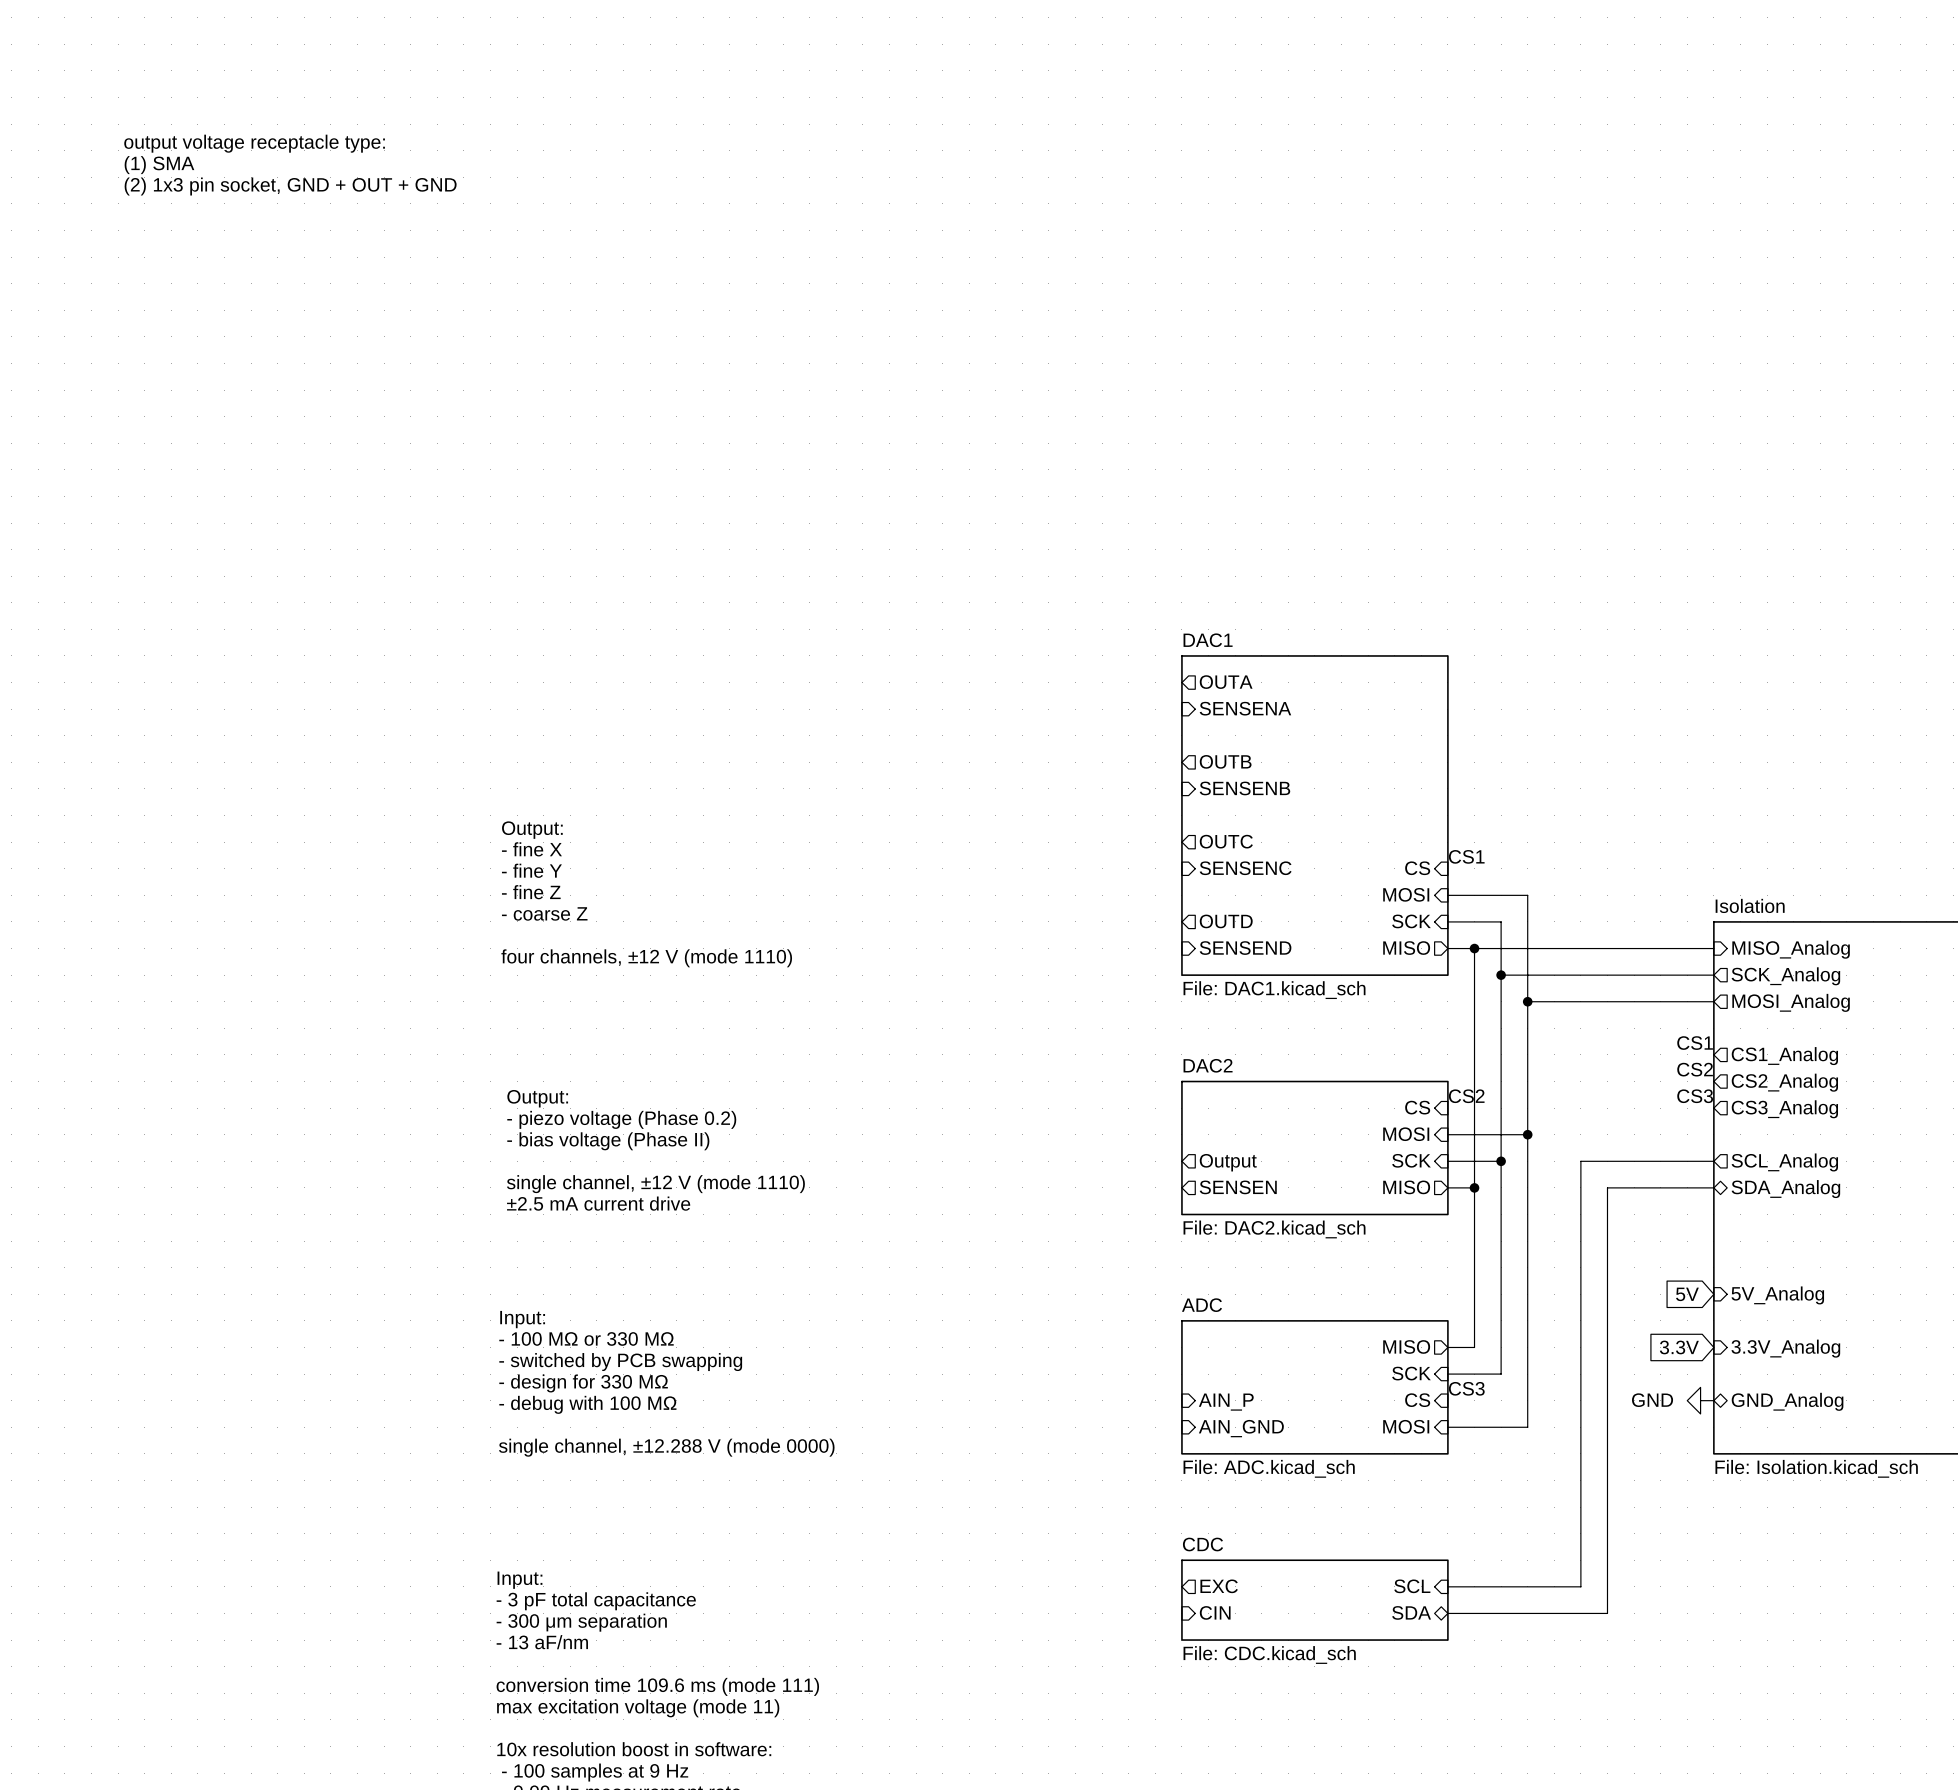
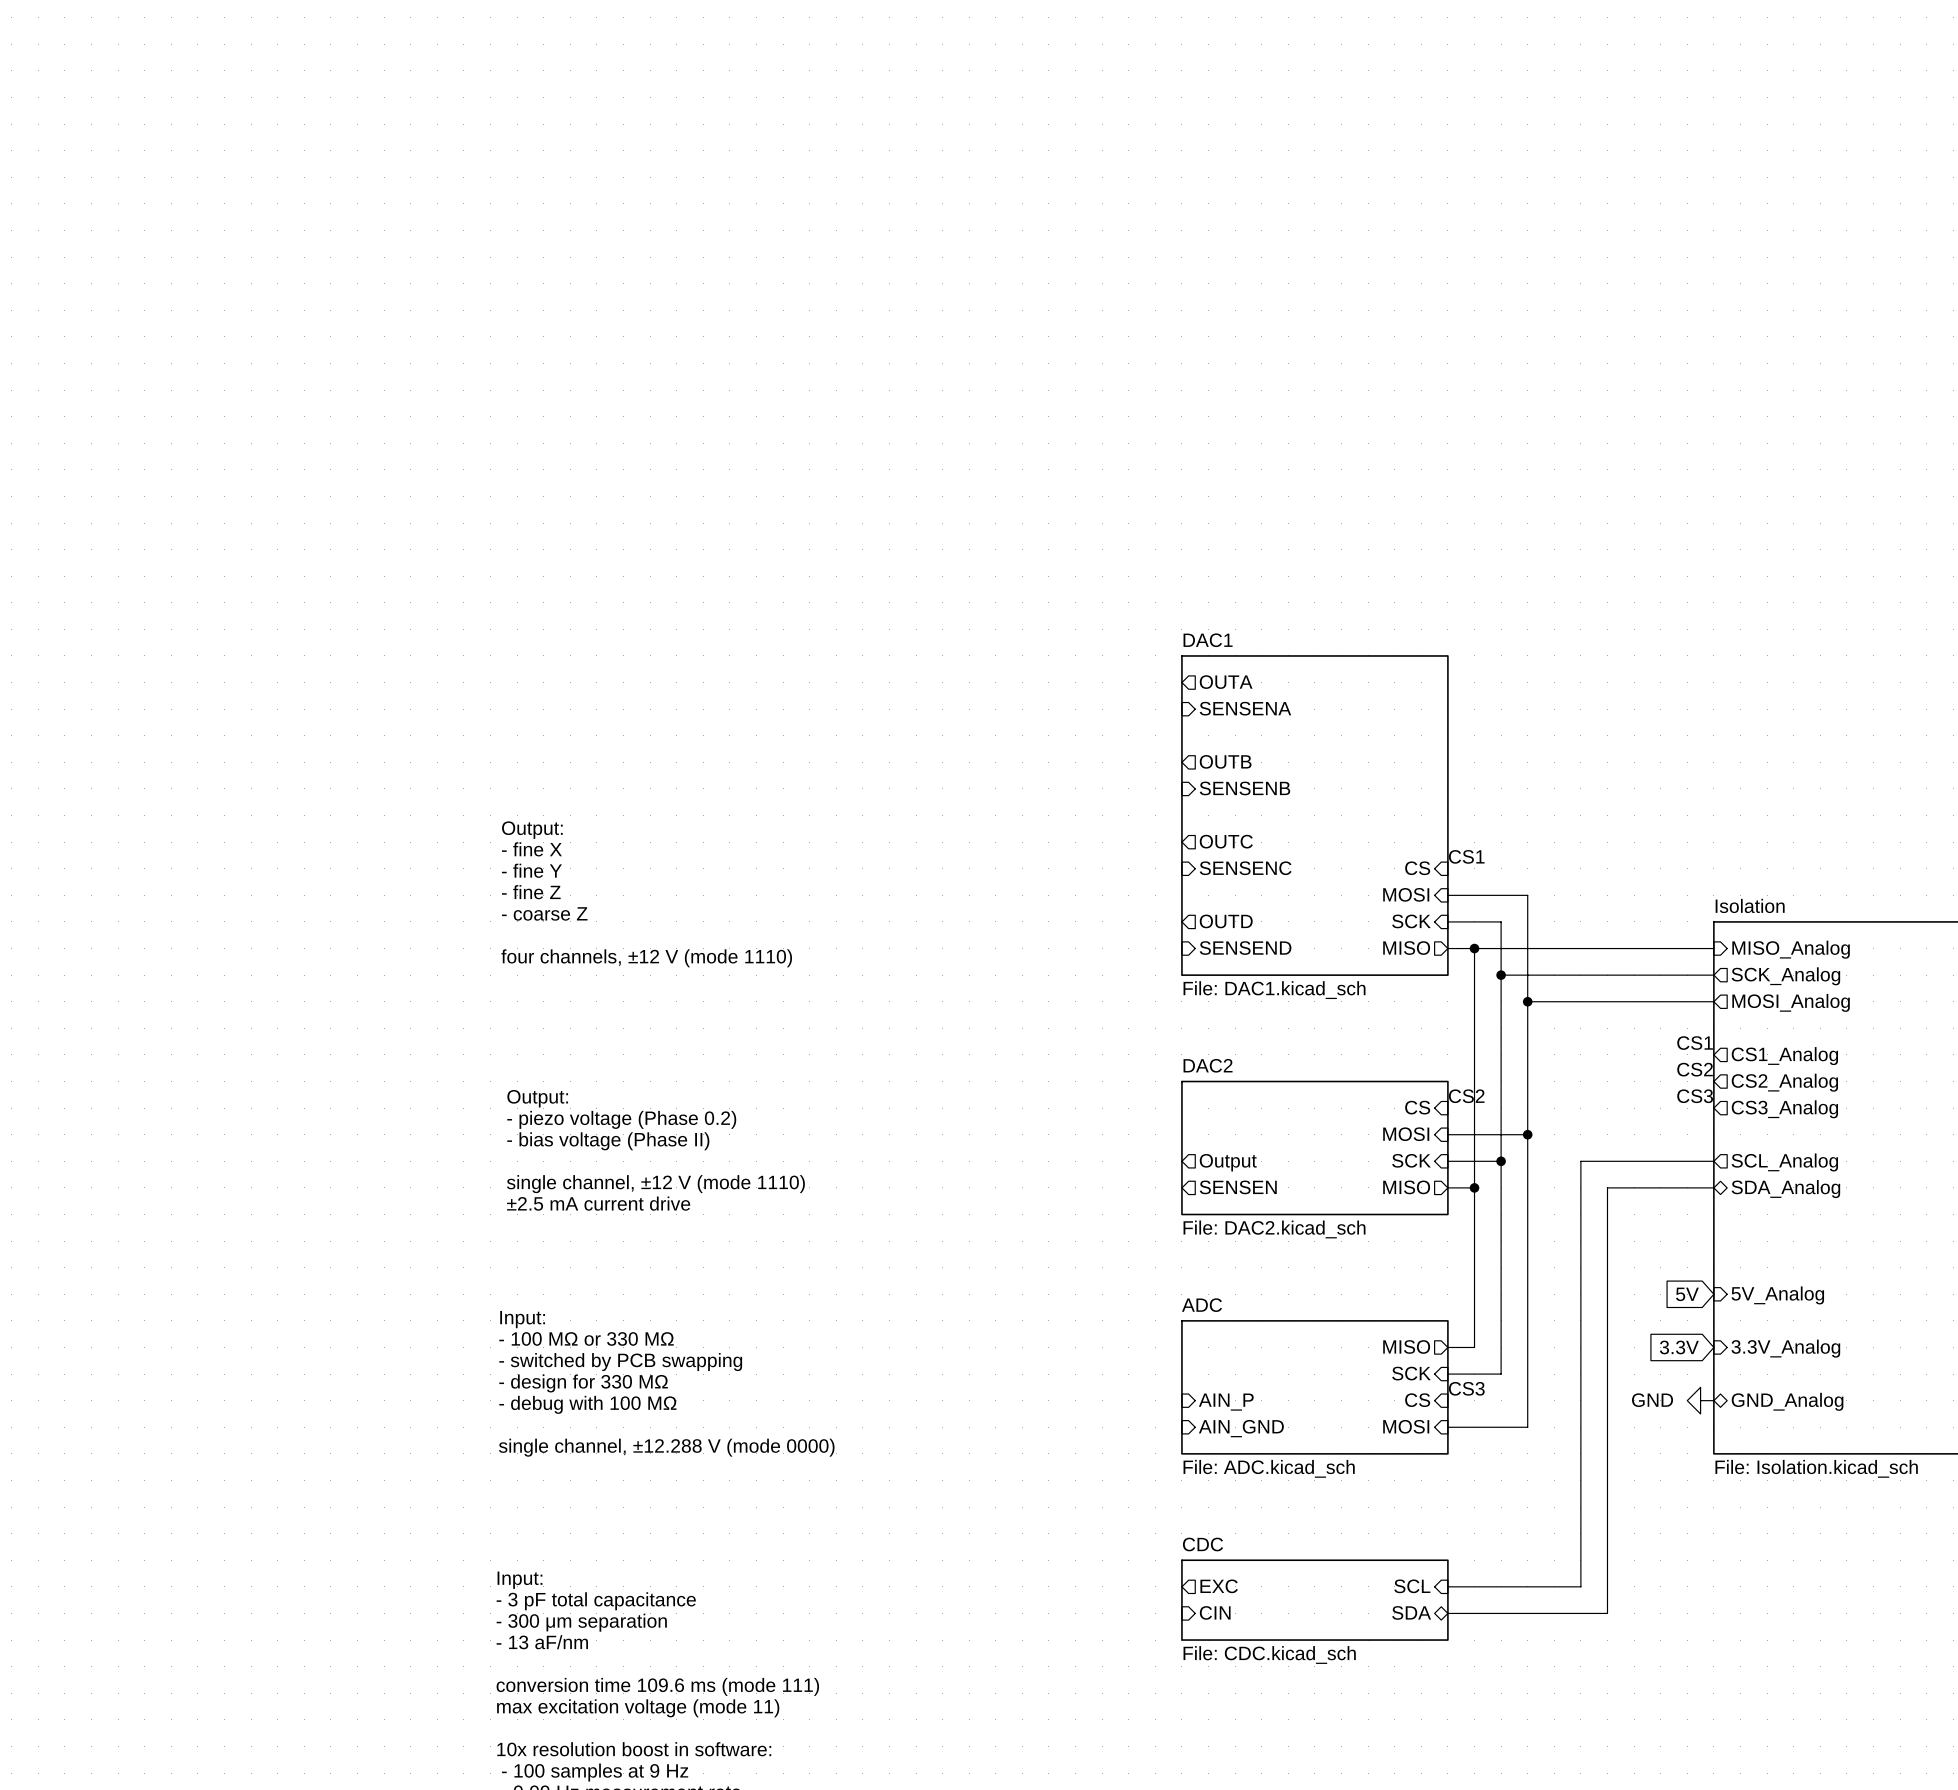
text: output voltage receptacle type: (254, 143) -> none
text: (1) SMA (159, 165) -> none
text: (2) 1x3 pin socket, GND + OUT + GND (290, 186) -> none

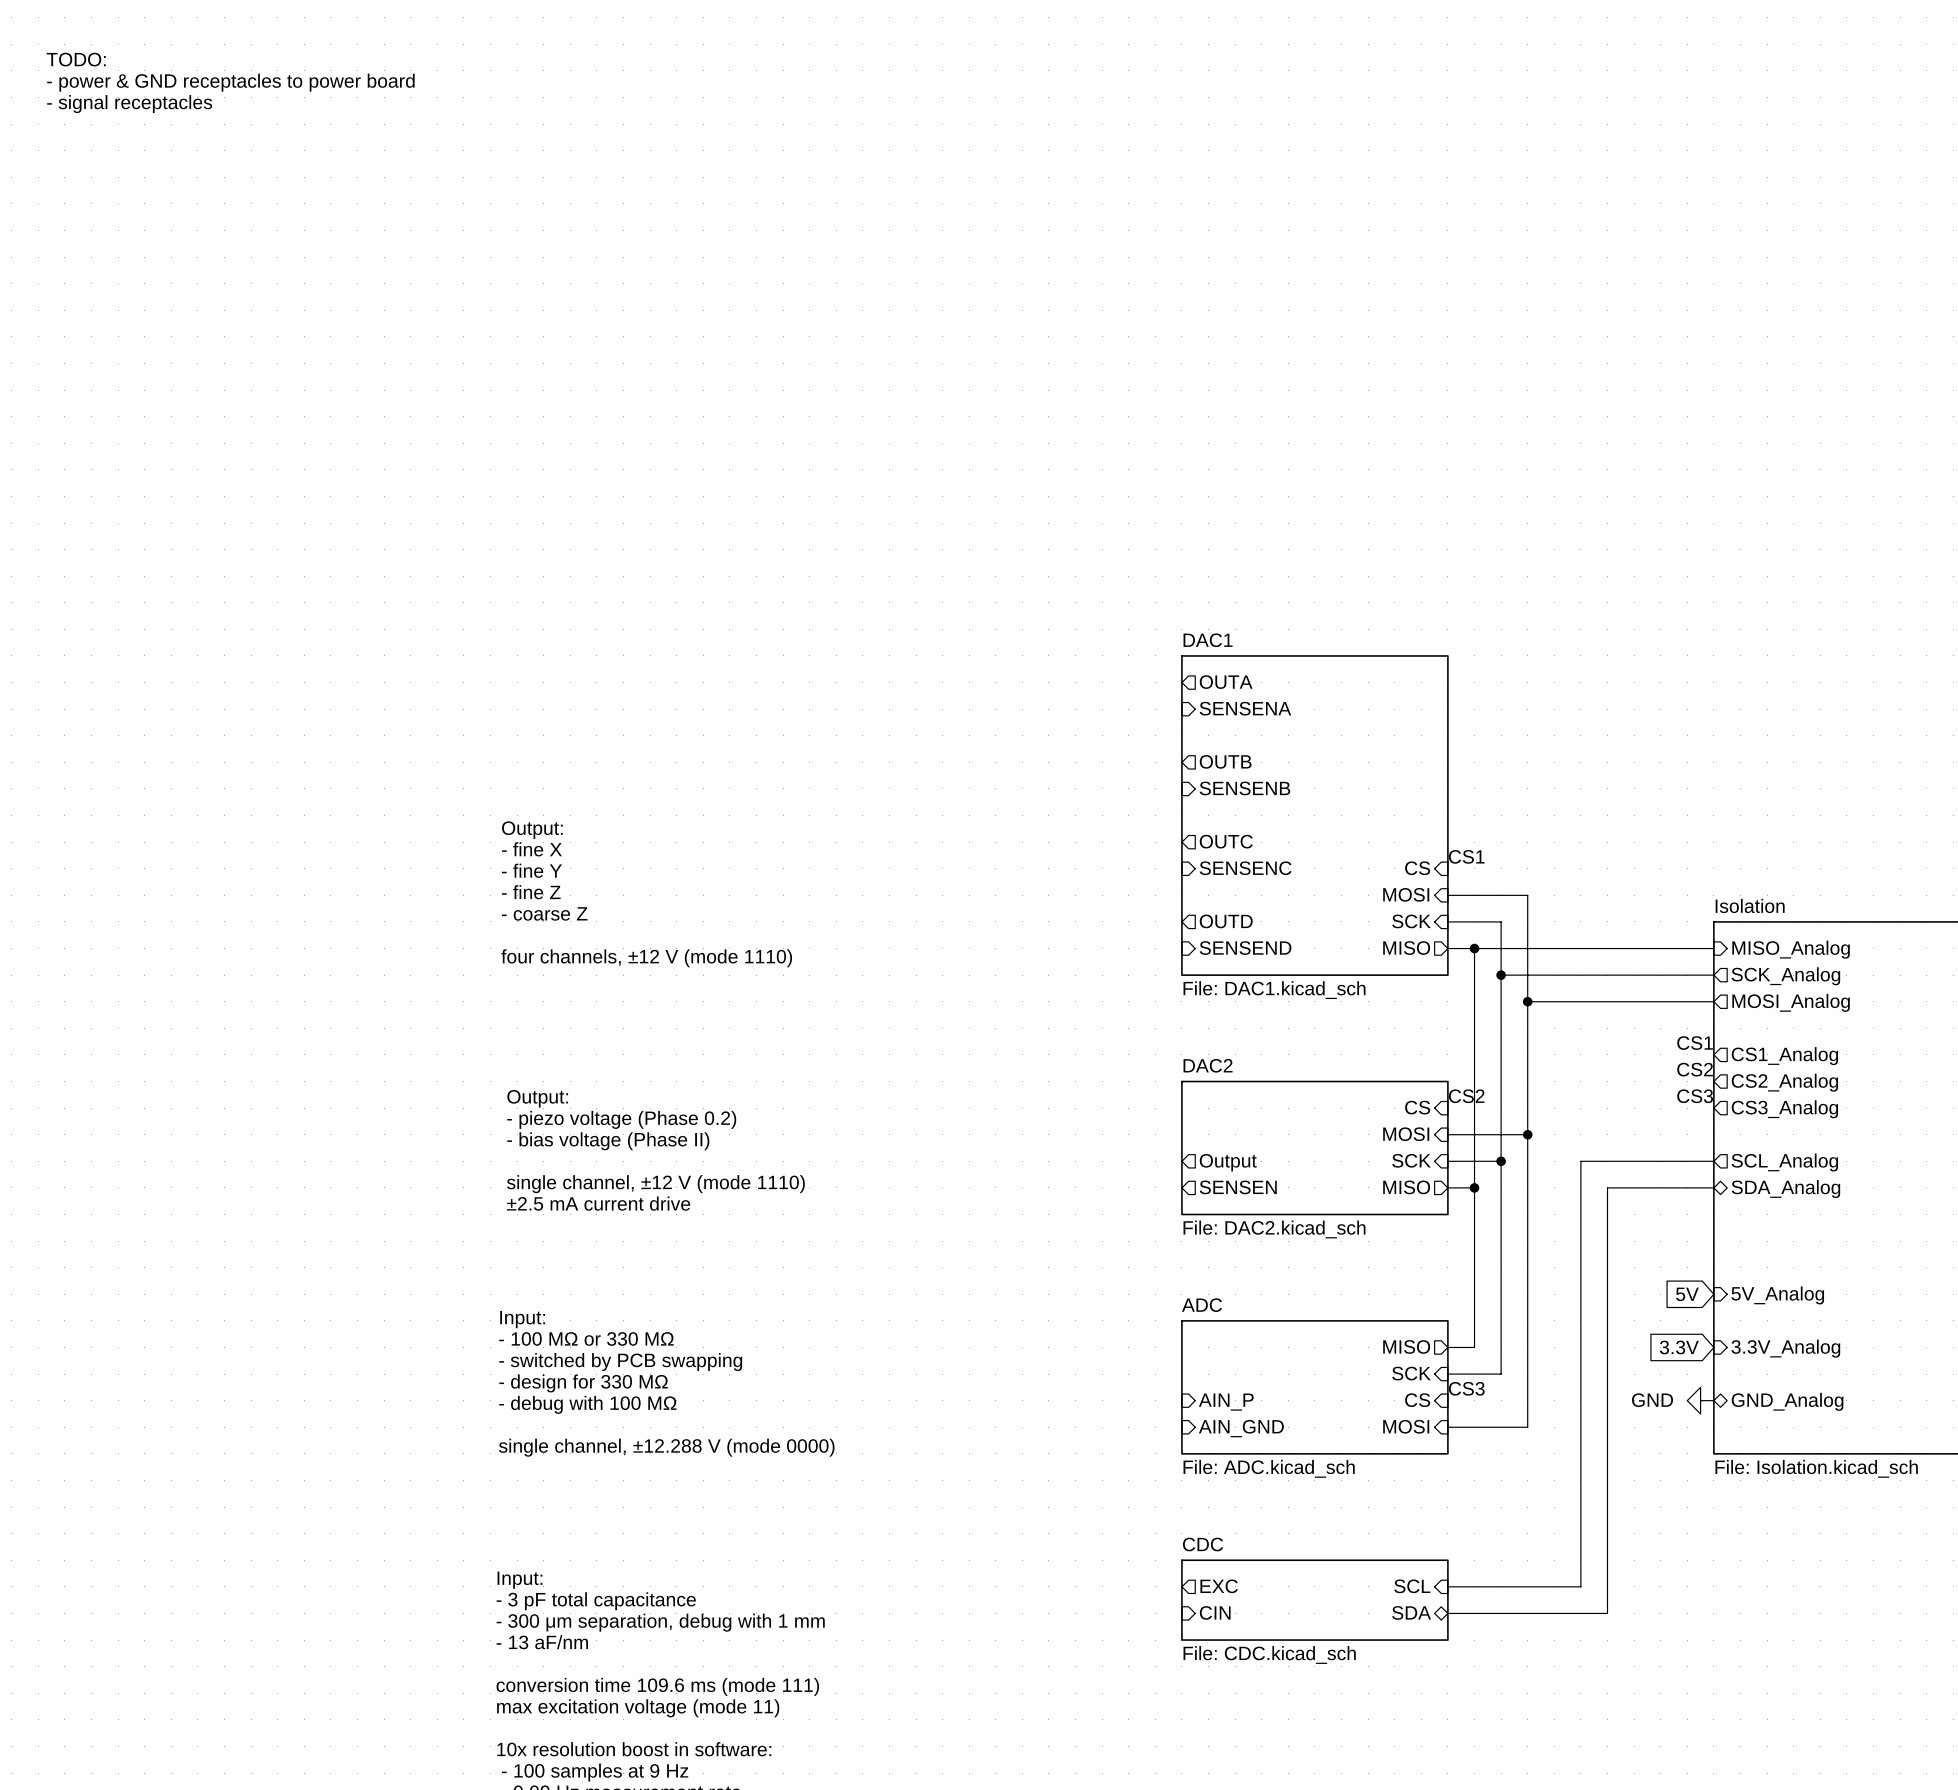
text: none -> TODO: (76, 59)
text: none -> - power & GND receptacles to power board (230, 82)
text: none -> - signal receptacles (129, 104)
text: - 300 μm separation (581, 1622) -> - 300 μm separation, debug with 1 mm (660, 1622)

